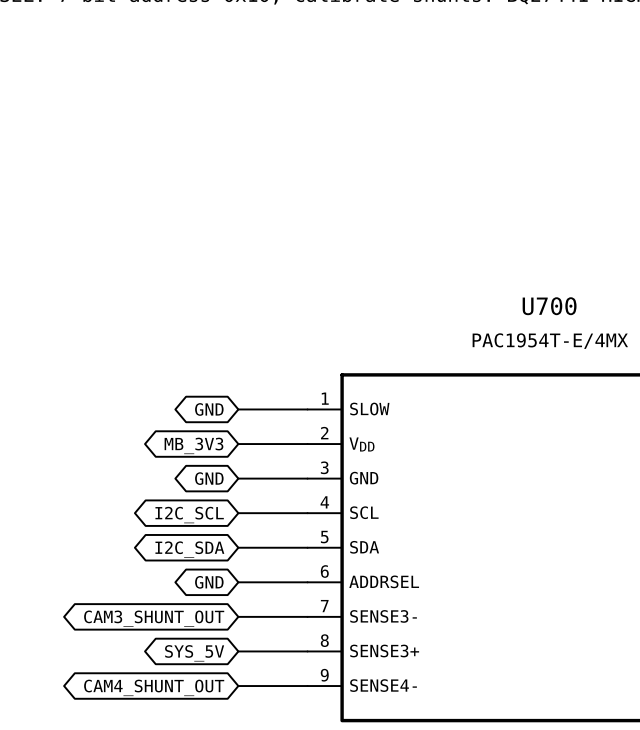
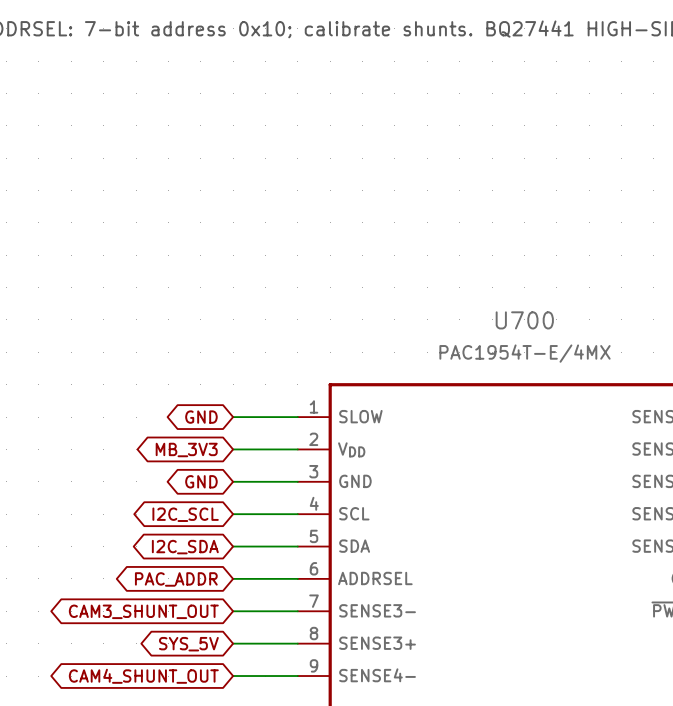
global label: GND (209, 582) -> PAC_ADDR (176, 579)

